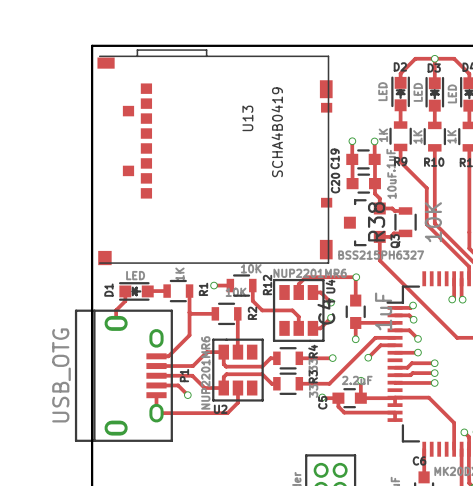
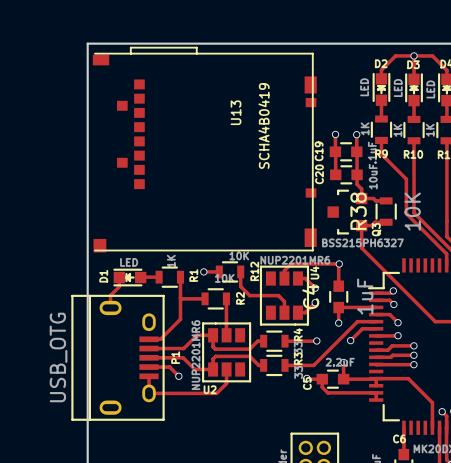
track: (454, 278) (454, 297) (452, 299) -> none
track: (461, 278) (462, 299) -> none
via: (452, 299) -> none
via: (462, 299) -> none

